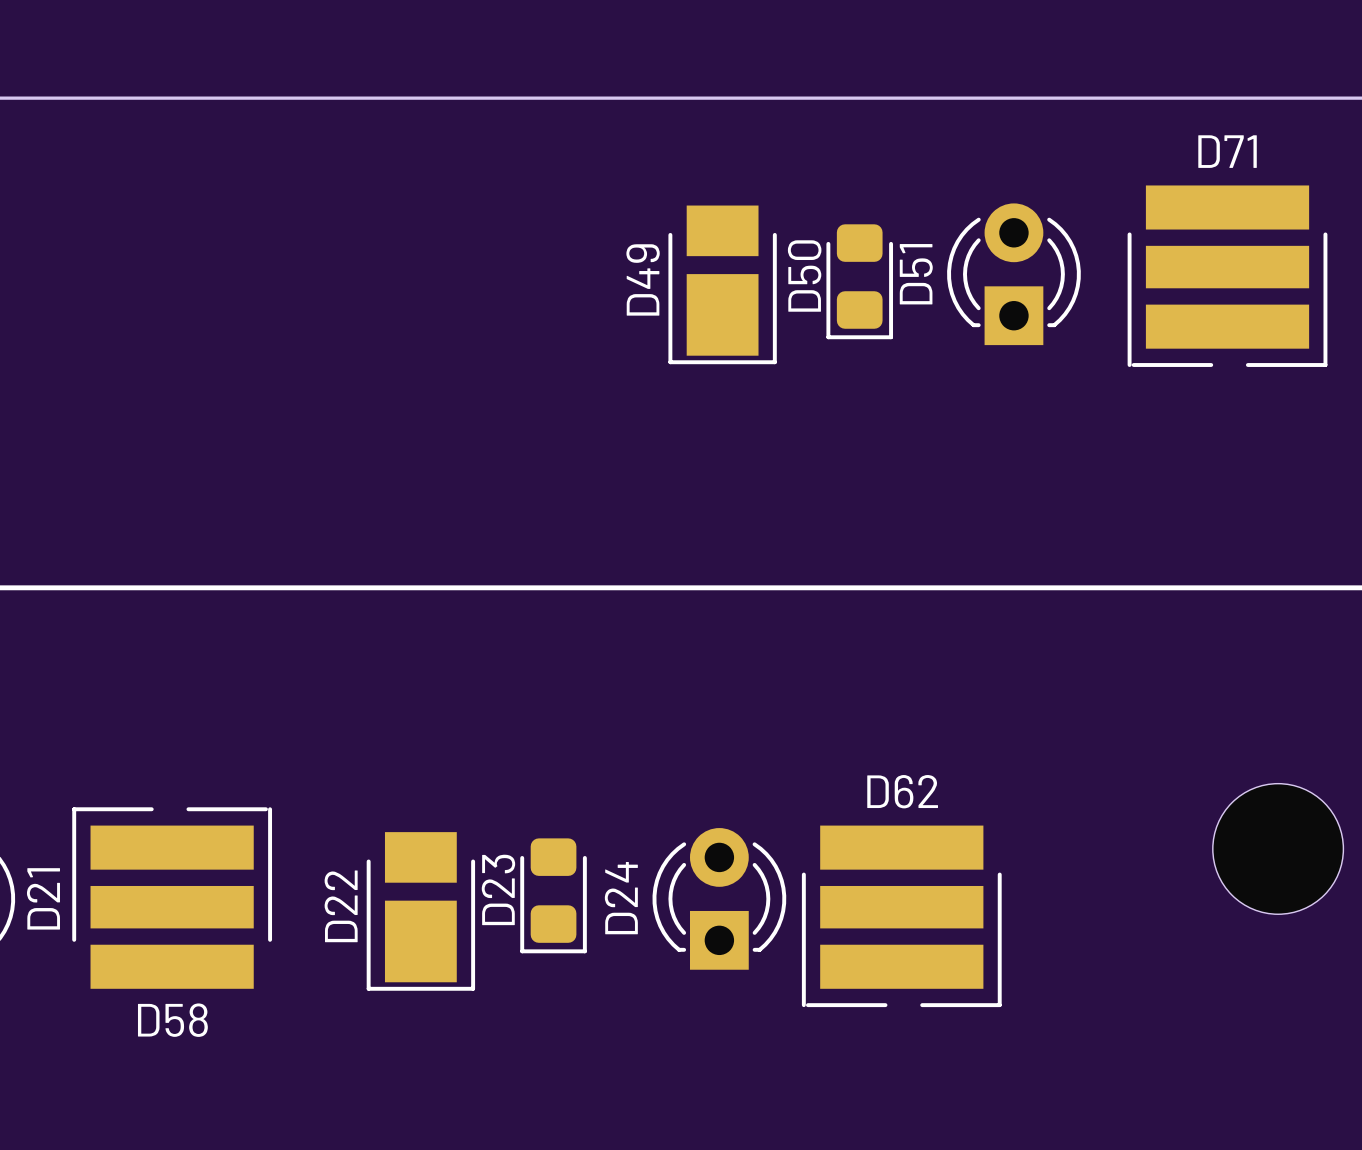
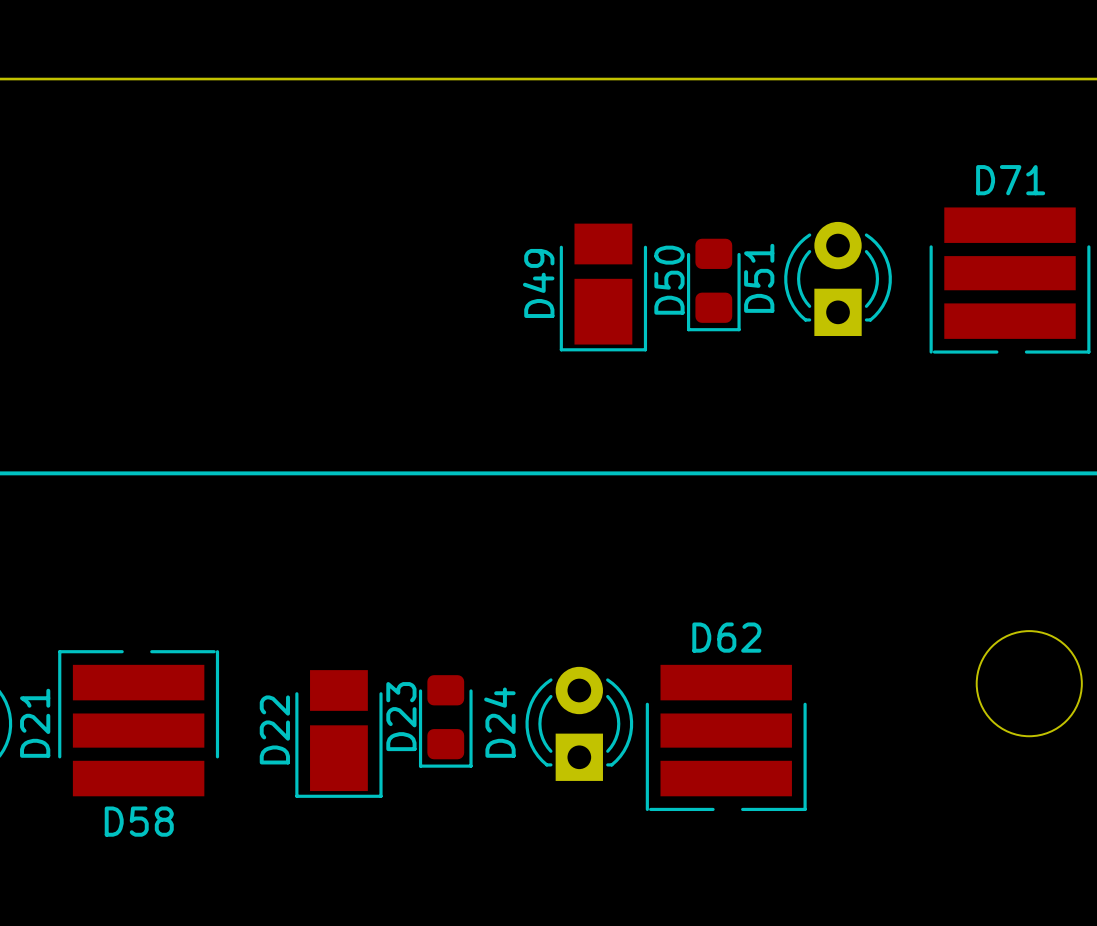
D51 footprint: [947, 203, 1081, 346] -> [784, 221, 892, 337]
D71 position: (1227, 276) -> (1010, 280)
D50 position: (859, 281) -> (713, 285)
D49 position: (722, 284) -> (603, 287)

